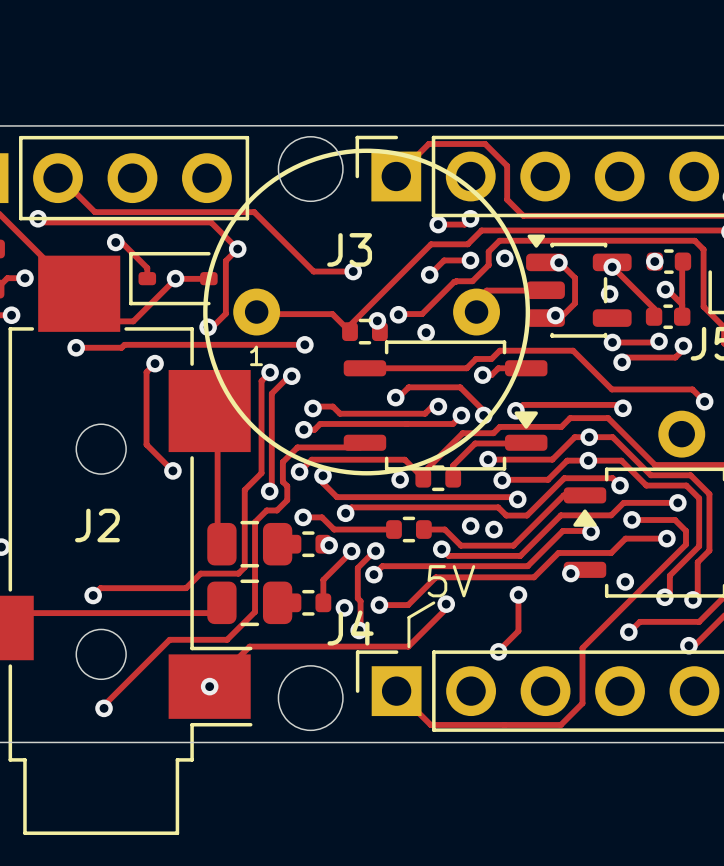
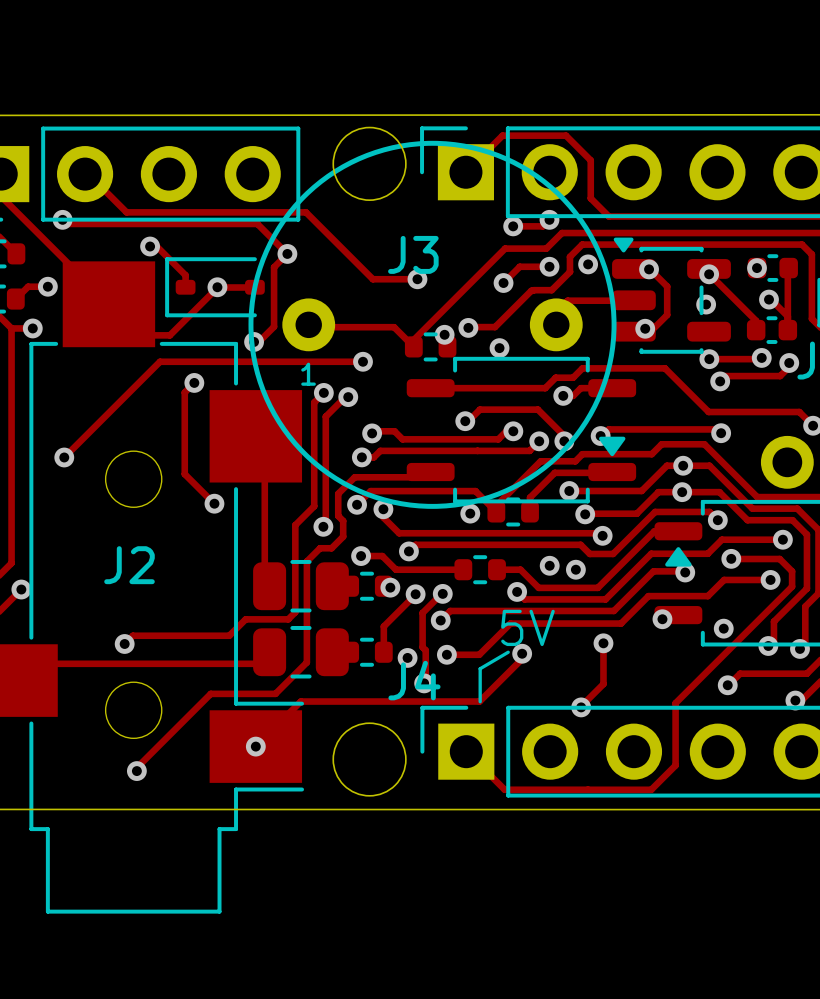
track: (76, 347) (121, 347) -> (64, 457) (156, 365)
via: (76, 347) -> none
via: none -> (64, 457)

